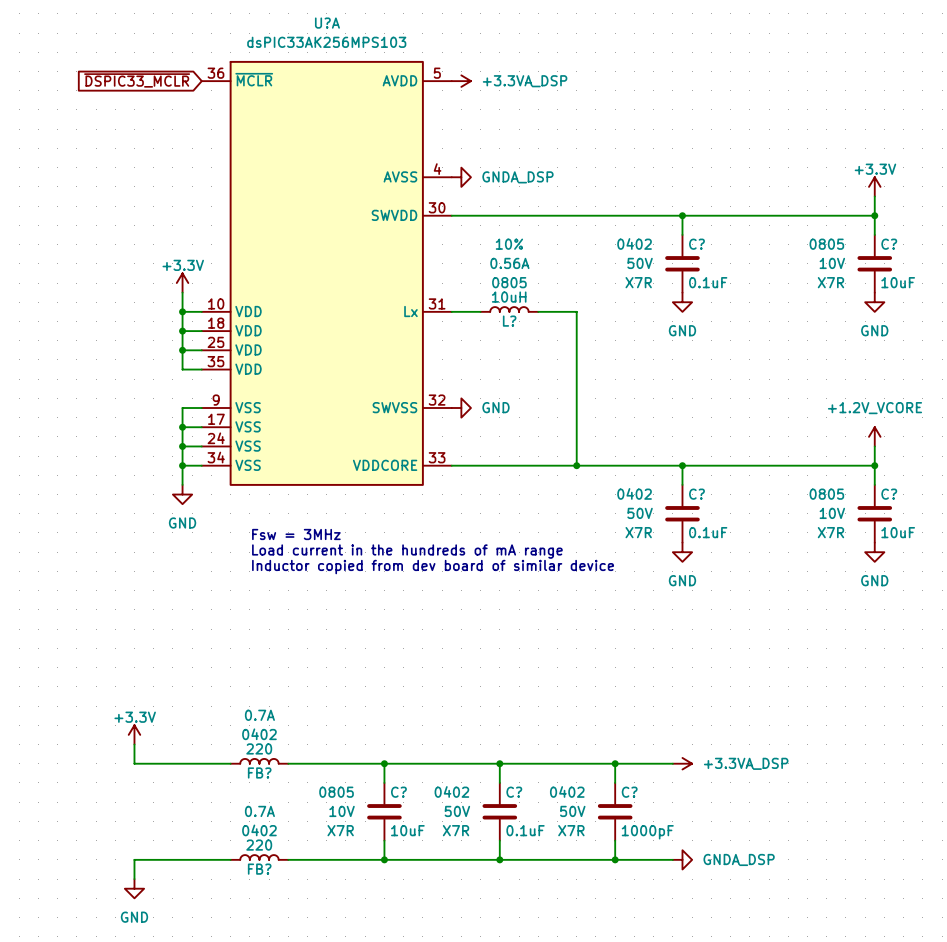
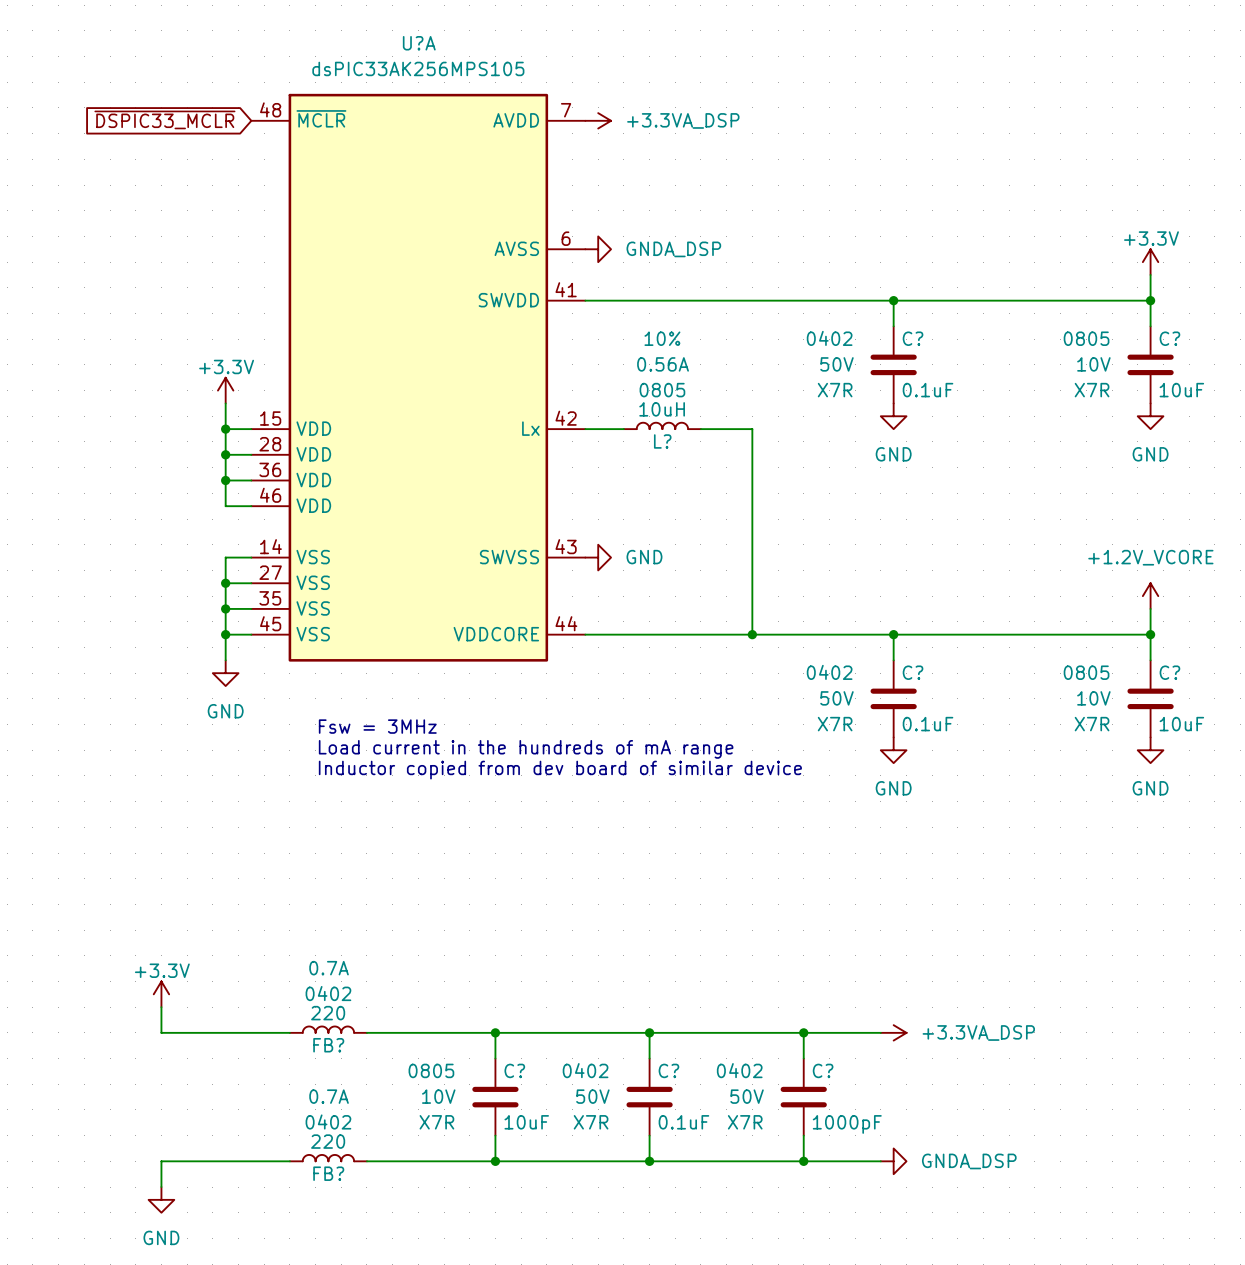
U?A value: dsPIC33AK256MPS103 (326, 42) -> dsPIC33AK256MPS105 (418, 68)
U?A symbol: [201, 60, 452, 486] -> [251, 93, 586, 662]

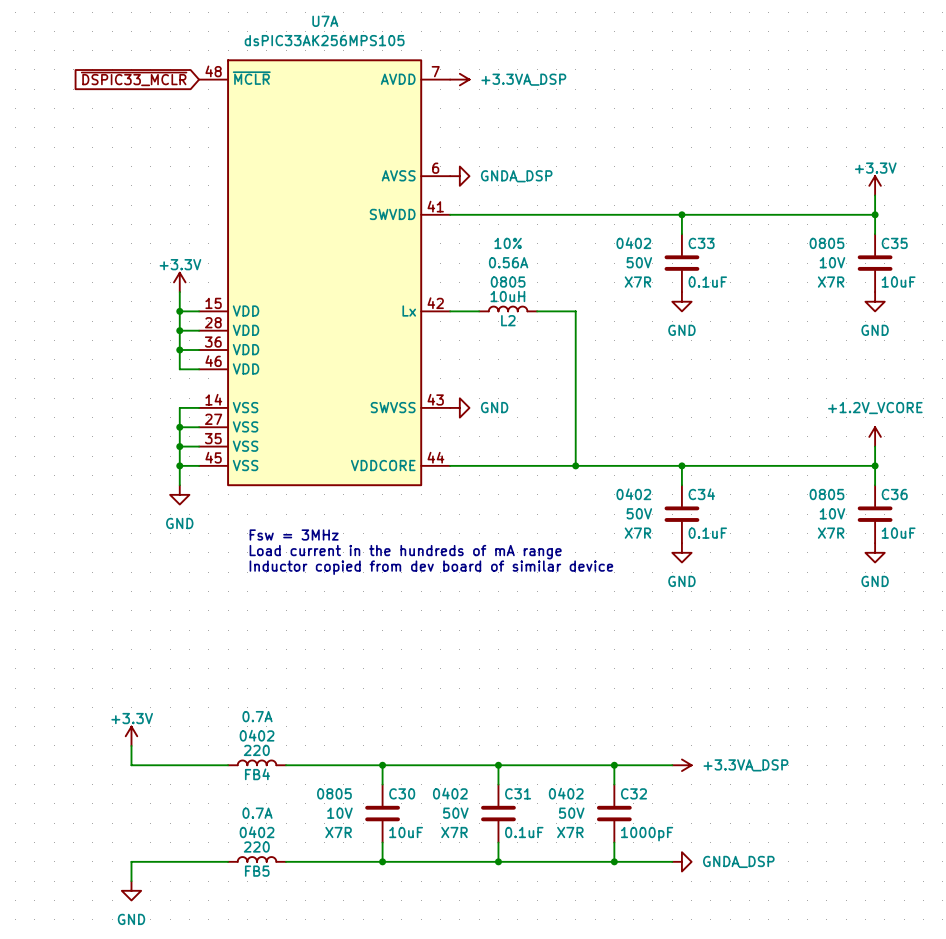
U?A name: U?A (419, 43) -> U7A (325, 21)
C? name: C? (913, 338) -> C33 (701, 243)
C? name: C? (1169, 338) -> C35 (894, 243)
L? name: L? (662, 441) -> L2 (508, 320)
C? name: C? (913, 672) -> C34 (701, 494)
C? name: C? (1169, 672) -> C36 (894, 494)
FB? name: FB? (328, 1045) -> FB4 (257, 774)
C? name: C? (514, 1070) -> C30 (402, 793)
C? name: C? (668, 1070) -> C31 (518, 793)
C? name: C? (823, 1070) -> C32 (633, 793)
FB? name: FB? (328, 1173) -> FB5 (257, 871)

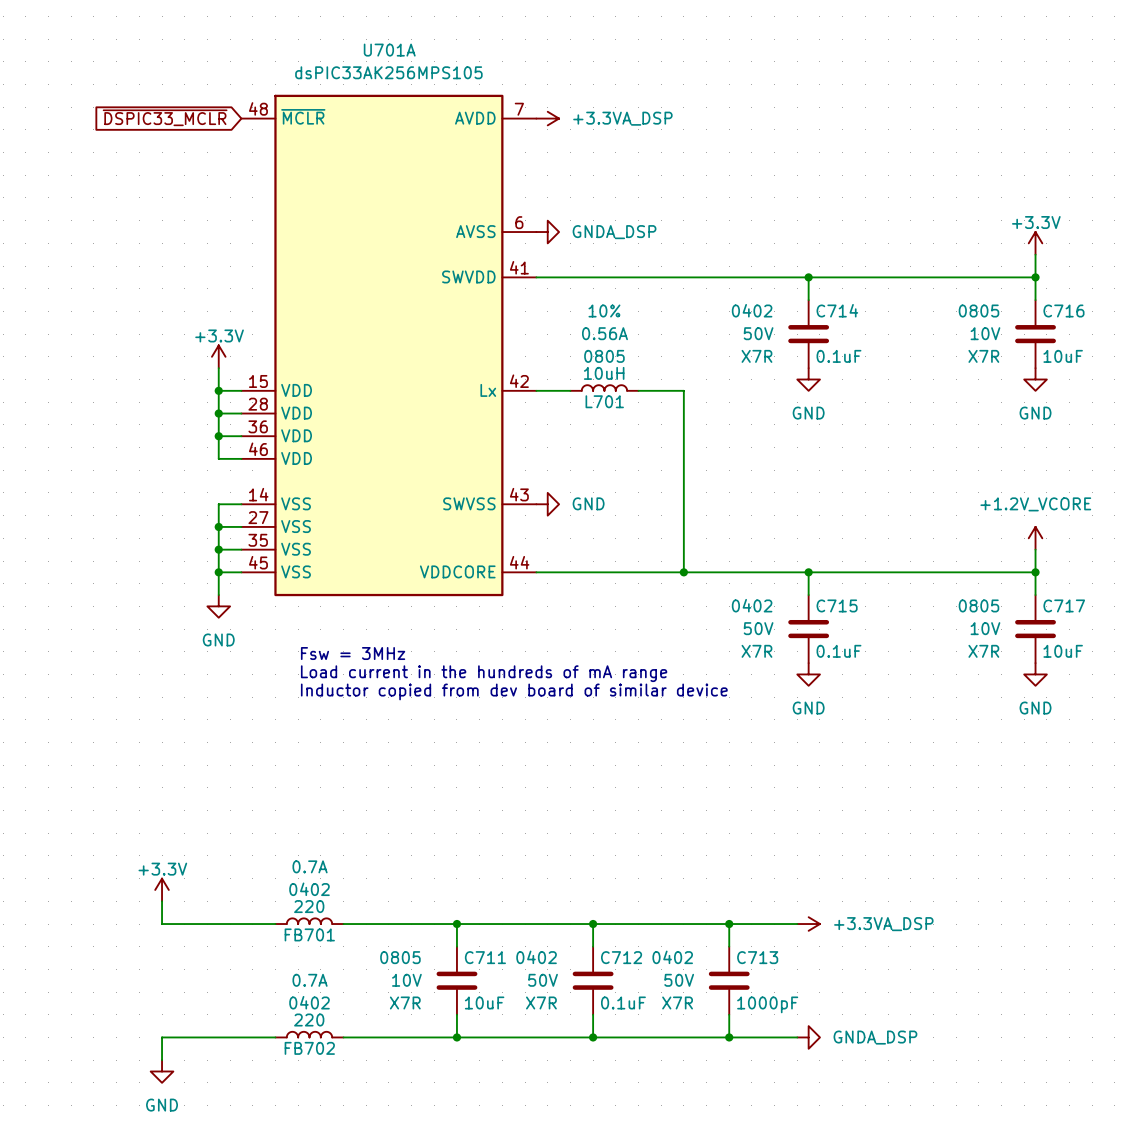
U7A name: U7A (325, 21) -> U701A (389, 50)
C33 name: C33 (701, 243) -> C714 (837, 310)
C35 name: C35 (894, 243) -> C716 (1063, 311)
L2 name: L2 (508, 320) -> L701 (604, 401)
C34 name: C34 (701, 494) -> C715 (837, 605)
C36 name: C36 (894, 494) -> C717 (1064, 605)
FB4 name: FB4 (257, 774) -> FB701 (309, 934)
C30 name: C30 (402, 793) -> C711 (485, 957)
C31 name: C31 (518, 793) -> C712 (621, 957)
C32 name: C32 (633, 793) -> C713 (757, 957)
FB5 name: FB5 (257, 871) -> FB702 (309, 1048)

